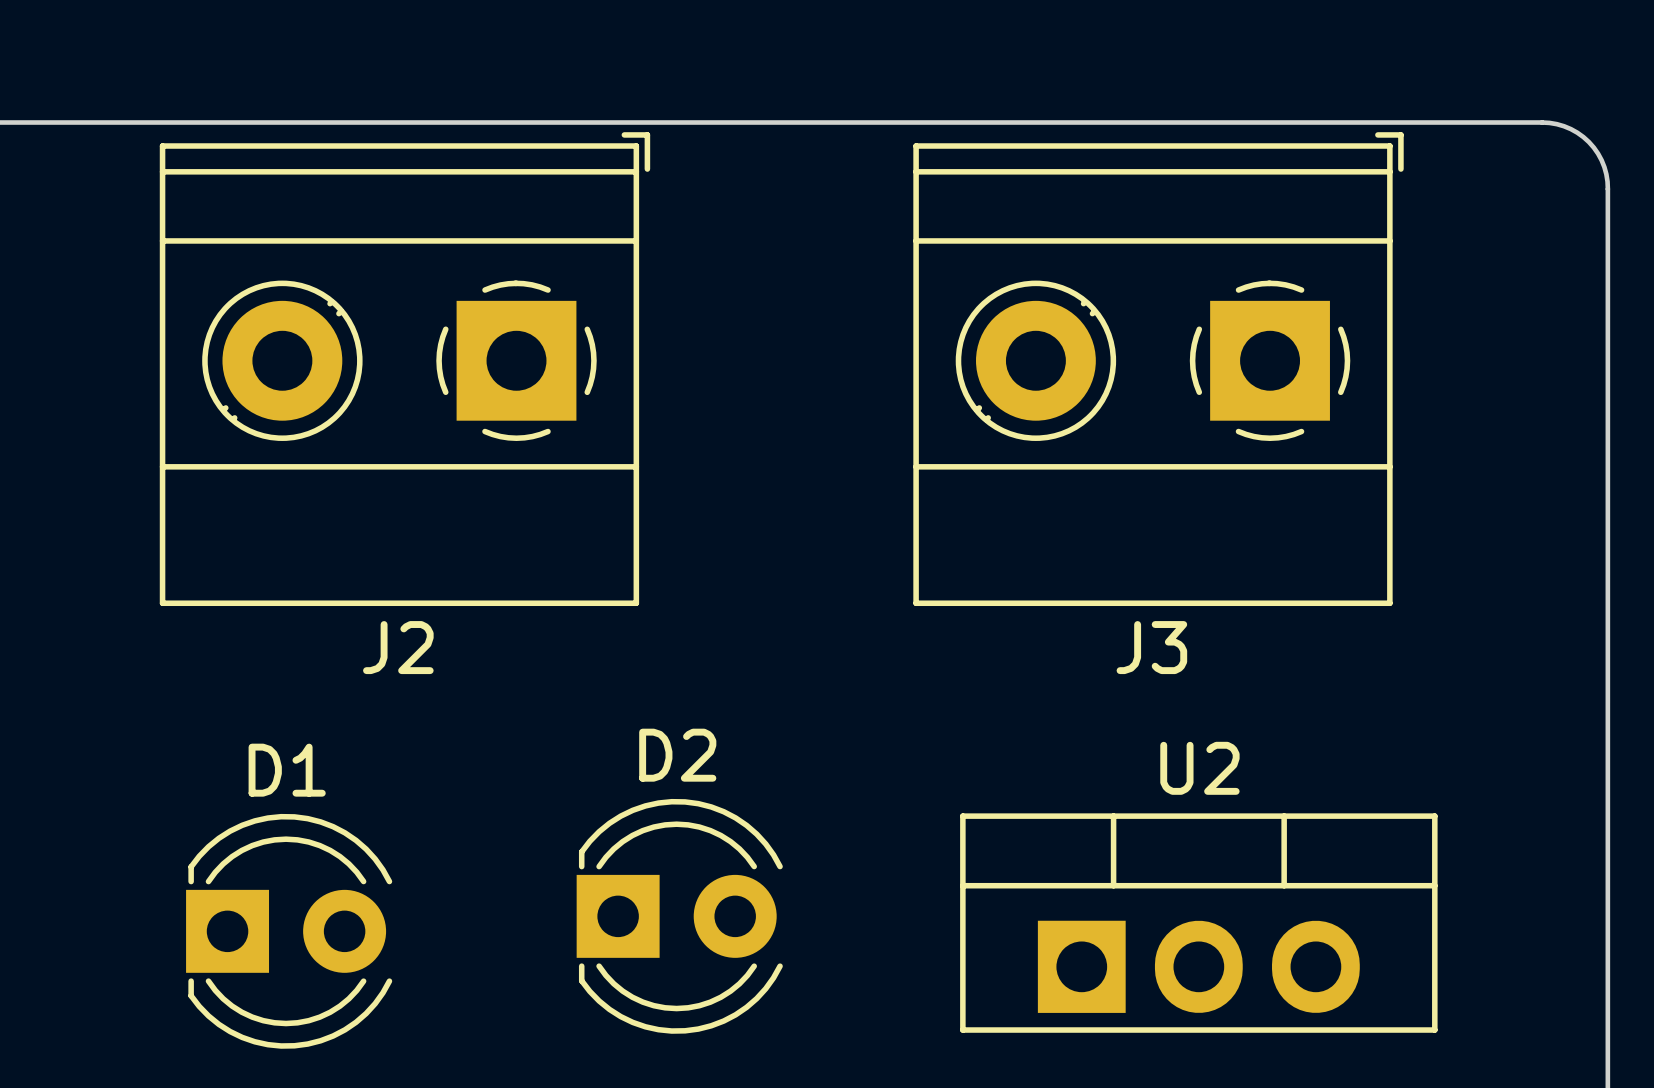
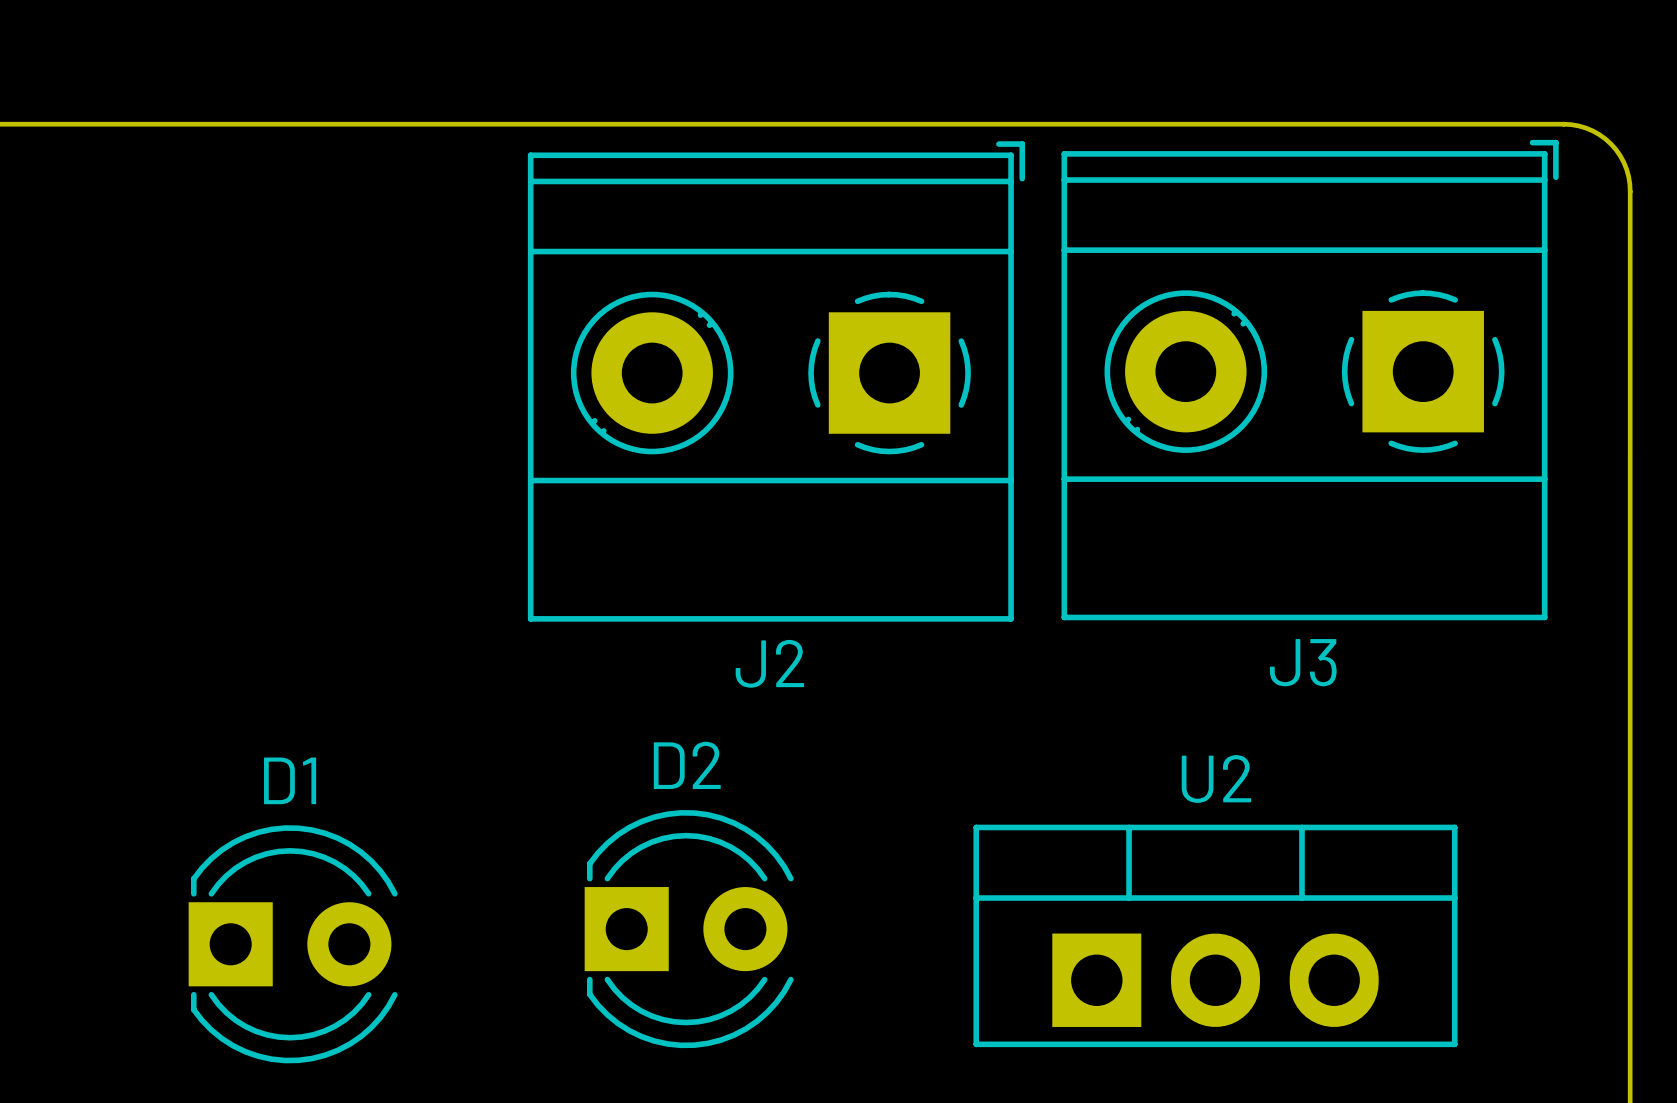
J2 position: (404, 369) -> (776, 381)
J3 position: (1158, 369) -> (1310, 380)

